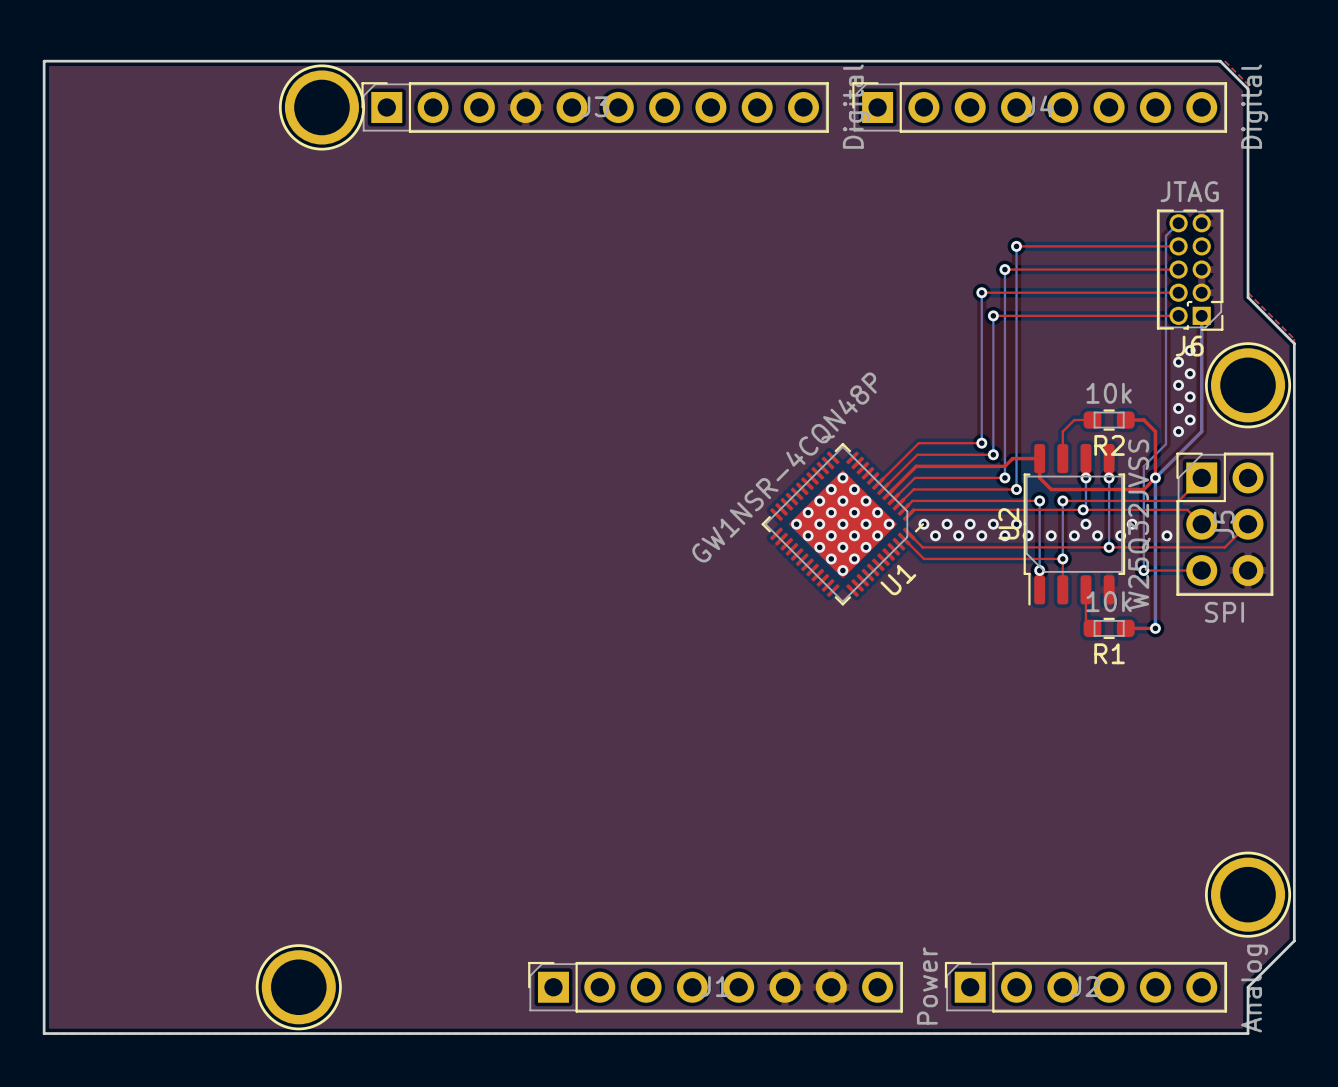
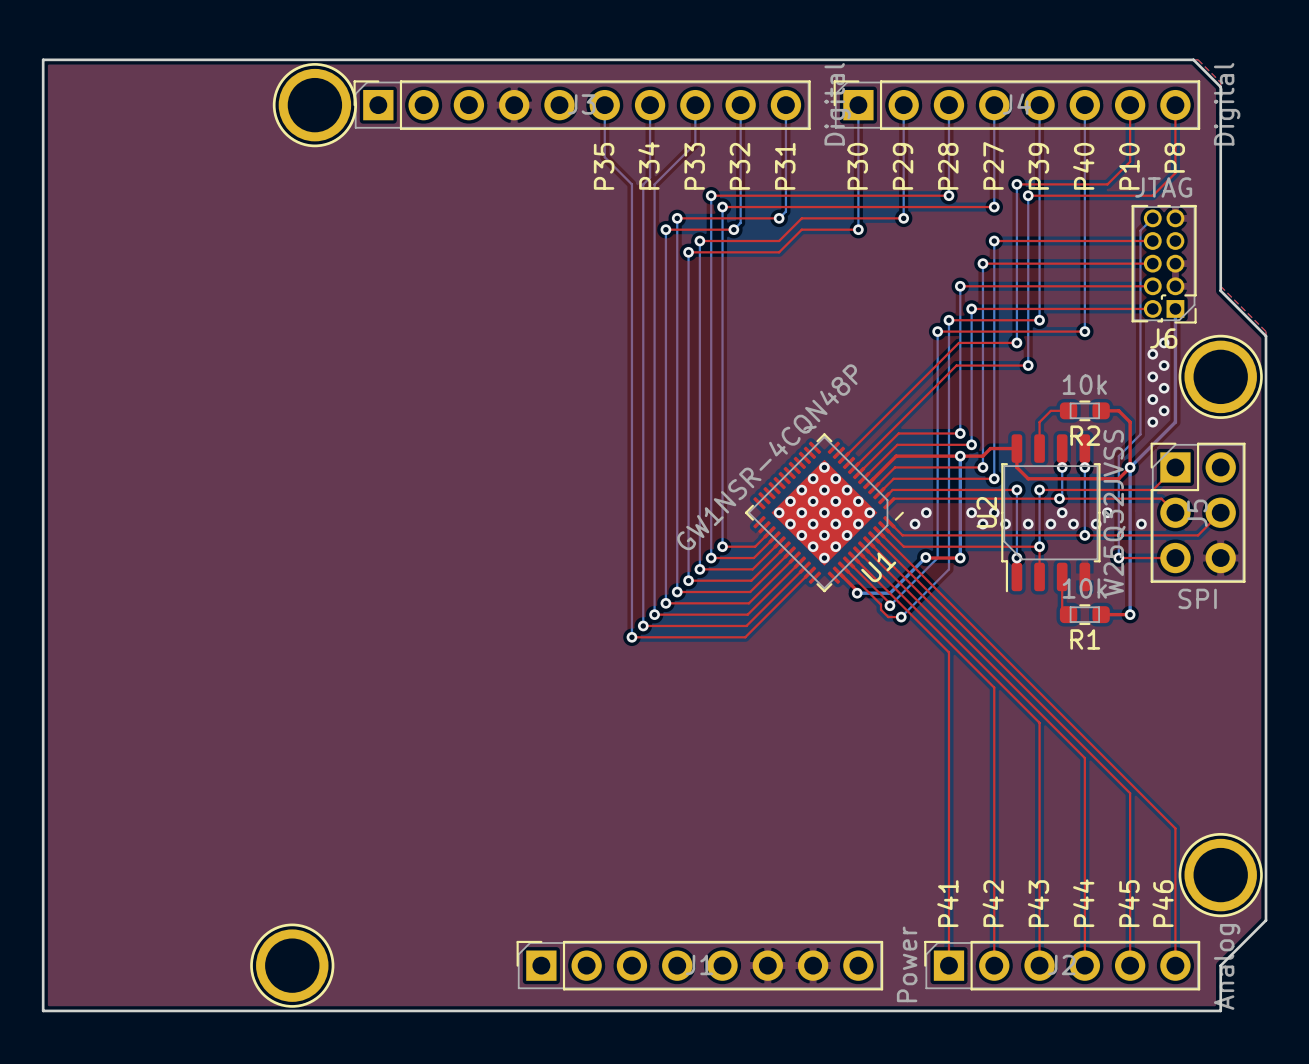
bottom track: none -> (604, 105) (604, 157) (631, 184) (631, 637)
bottom track: none -> (650, 105) (650, 177) (643, 184) (643, 625)
bottom track: none -> (695, 105) (695, 143) (654, 184) (654, 614)
bottom track: none -> (740, 105) (740, 222) (733, 229)
bottom track: none -> (785, 105) (785, 211) (779, 218)
bottom track: none -> (858, 105) (858, 229)
bottom track: none -> (903, 105) (903, 218)
bottom track: none -> (948, 105) (948, 195)
bottom track: none -> (994, 105) (994, 207)
bottom track: none -> (1039, 105) (1039, 320)
bottom track: none -> (1084, 105) (1084, 331)
top track: none -> (1130, 105) (1130, 161) (1107, 184) (1016, 184)
top track: none -> (1175, 105) (1175, 173) (1152, 195) (1028, 195)
text: none -> P8 (1174, 157)
text: none -> P34 (648, 165)
text: none -> P27 (993, 165)
text: none -> P35 (604, 166)
text: none -> P33 (694, 166)
text: none -> P32 (739, 166)
text: none -> P31 (785, 166)
text: none -> P30 (857, 166)
text: none -> P29 (903, 166)
text: none -> P28 (948, 166)
text: none -> P39 (1038, 166)
text: none -> P40 (1083, 166)
text: none -> P10 (1129, 166)
bottom track: none -> (1016, 184) (1016, 342)
via: none -> (1016, 184)
top track: none -> (711, 195) (948, 195)
bottom track: none -> (711, 195) (711, 558)
via: none -> (711, 195)
via: none -> (948, 195)
bottom track: none -> (1028, 195) (1028, 365)
via: none -> (1028, 195)
top track: none -> (722, 207) (994, 207)
bottom track: none -> (722, 207) (722, 546)
via: none -> (722, 207)
via: none -> (994, 207)
top track: none -> (677, 218) (779, 218)
bottom track: none -> (677, 218) (677, 592)
via: none -> (677, 218)
via: none -> (779, 218)
top track: none -> (903, 218) (801, 218) (779, 241) (699, 241)
via: none -> (903, 218)
top track: none -> (665, 229) (733, 229)
bottom track: none -> (665, 229) (665, 603)
via: none -> (665, 229)
via: none -> (733, 229)
top track: none -> (858, 229) (801, 229) (779, 252) (688, 252)
via: none -> (858, 229)
bottom track: none -> (699, 241) (699, 569)
via: none -> (699, 241)
bottom track: none -> (688, 252) (688, 580)
via: none -> (688, 252)
top track: none -> (948, 320) (1039, 320)
bottom track: none -> (948, 320) (948, 569) (901, 617)
via: none -> (948, 320)
via: none -> (1039, 320)
top track: none -> (937, 331) (1084, 331)
bottom track: none -> (937, 331) (937, 558) (889, 605)
via: none -> (937, 331)
via: none -> (1084, 331)
top track: none -> (1016, 342) (958, 342) (843, 457)
via: none -> (1016, 342)
top track: none -> (1028, 365) (956, 365) (854, 467)
via: none -> (1028, 365)
bottom track: none -> (960, 456) (960, 558)
via: none -> (960, 456)
via: (923, 524) -> none
via: (970, 524) -> none
via: (958, 535) -> none
via: (981, 535) -> none
top track: none -> (769, 532) (755, 546) (722, 546)
top track: none -> (879, 532) (1175, 828) (1175, 965)
top track: none -> (774, 537) (753, 558) (711, 558)
top track: none -> (874, 537) (1130, 793) (1130, 965)
top track: none -> (779, 542) (752, 569) (699, 569)
top track: none -> (869, 542) (1084, 758) (1084, 965)
via: none -> (722, 546)
top track: none -> (784, 547) (751, 580) (688, 580)
top track: none -> (864, 547) (1039, 722) (1039, 965)
top track: none -> (789, 552) (750, 592) (677, 592)
top track: none -> (859, 552) (994, 687) (994, 965)
top track: none -> (794, 557) (748, 603) (665, 603)
top track: none -> (854, 557) (948, 652) (948, 965)
top track: none -> (925, 557) (960, 558)
bottom track: none -> (925, 557) (890, 593) (857, 593)
via: none -> (925, 557)
via: none -> (711, 558)
via: none -> (960, 558)
top track: none -> (799, 562) (747, 614) (654, 614)
top track: none -> (849, 562) (889, 603) (889, 605)
top track: none -> (804, 567) (746, 625) (643, 625)
top track: none -> (843, 567) (881, 604) (881, 609) (888, 617) (901, 617)
via: none -> (699, 569)
top track: none -> (809, 572) (745, 637) (631, 637)
top track: none -> (838, 572) (857, 590) (857, 593)
via: none -> (688, 580)
via: none -> (677, 592)
via: none -> (857, 593)
via: none -> (665, 603)
via: none -> (889, 605)
via: none -> (654, 614)
via: none -> (901, 617)
via: none -> (643, 625)
via: none -> (631, 637)
text: none -> P41 (947, 903)
text: none -> P42 (993, 903)
text: none -> P43 (1038, 903)
text: none -> P44 (1083, 903)
text: none -> P45 (1129, 903)
text: none -> P46 (1163, 903)

